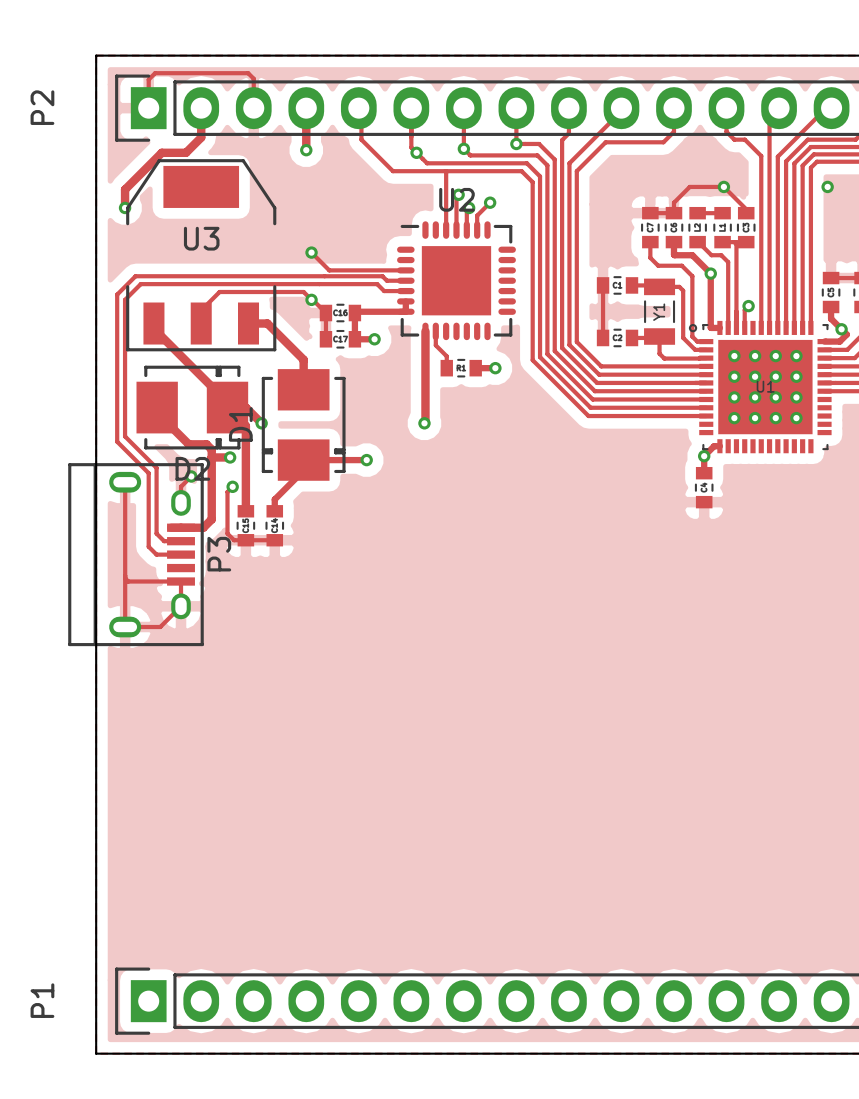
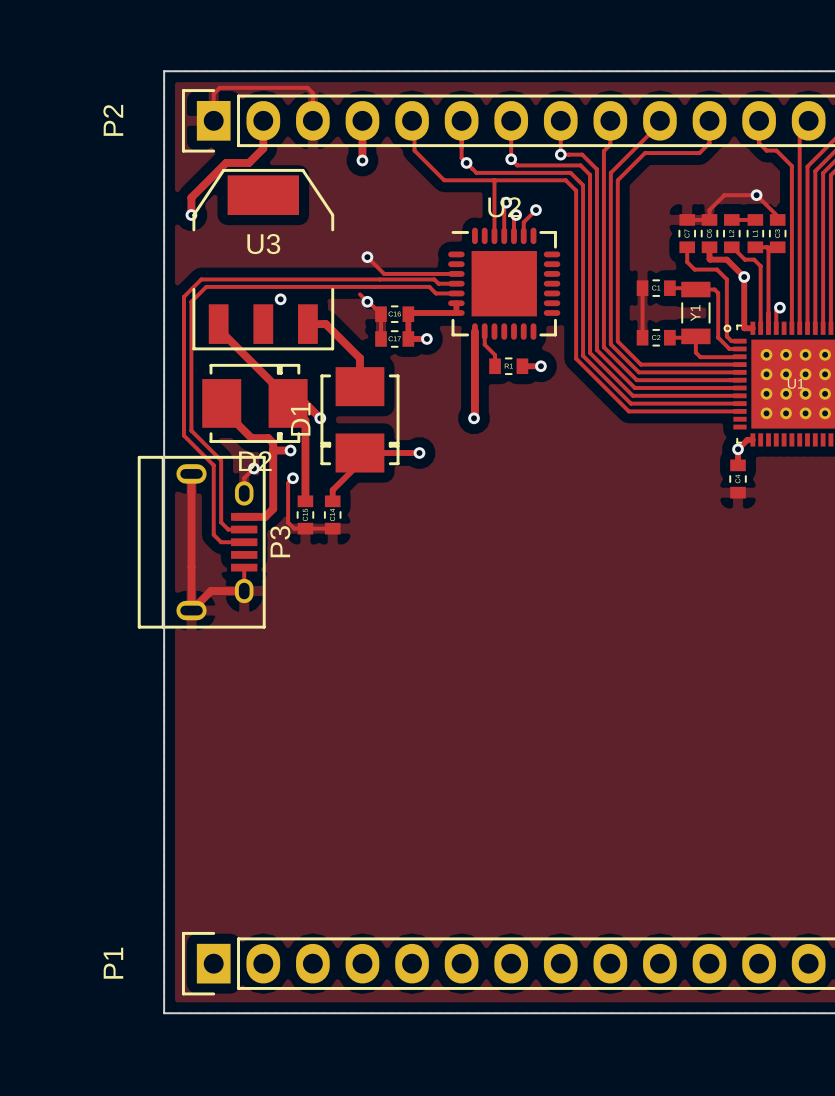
track: (303, 292) (219, 292) (201, 310) -> none
via: none -> (280, 299)
track: (125, 578) (128, 581) (181, 581) -> none
track: (181, 606) (160, 627) (125, 627) -> (244, 591) (211, 591) (191, 610) (191, 473)

